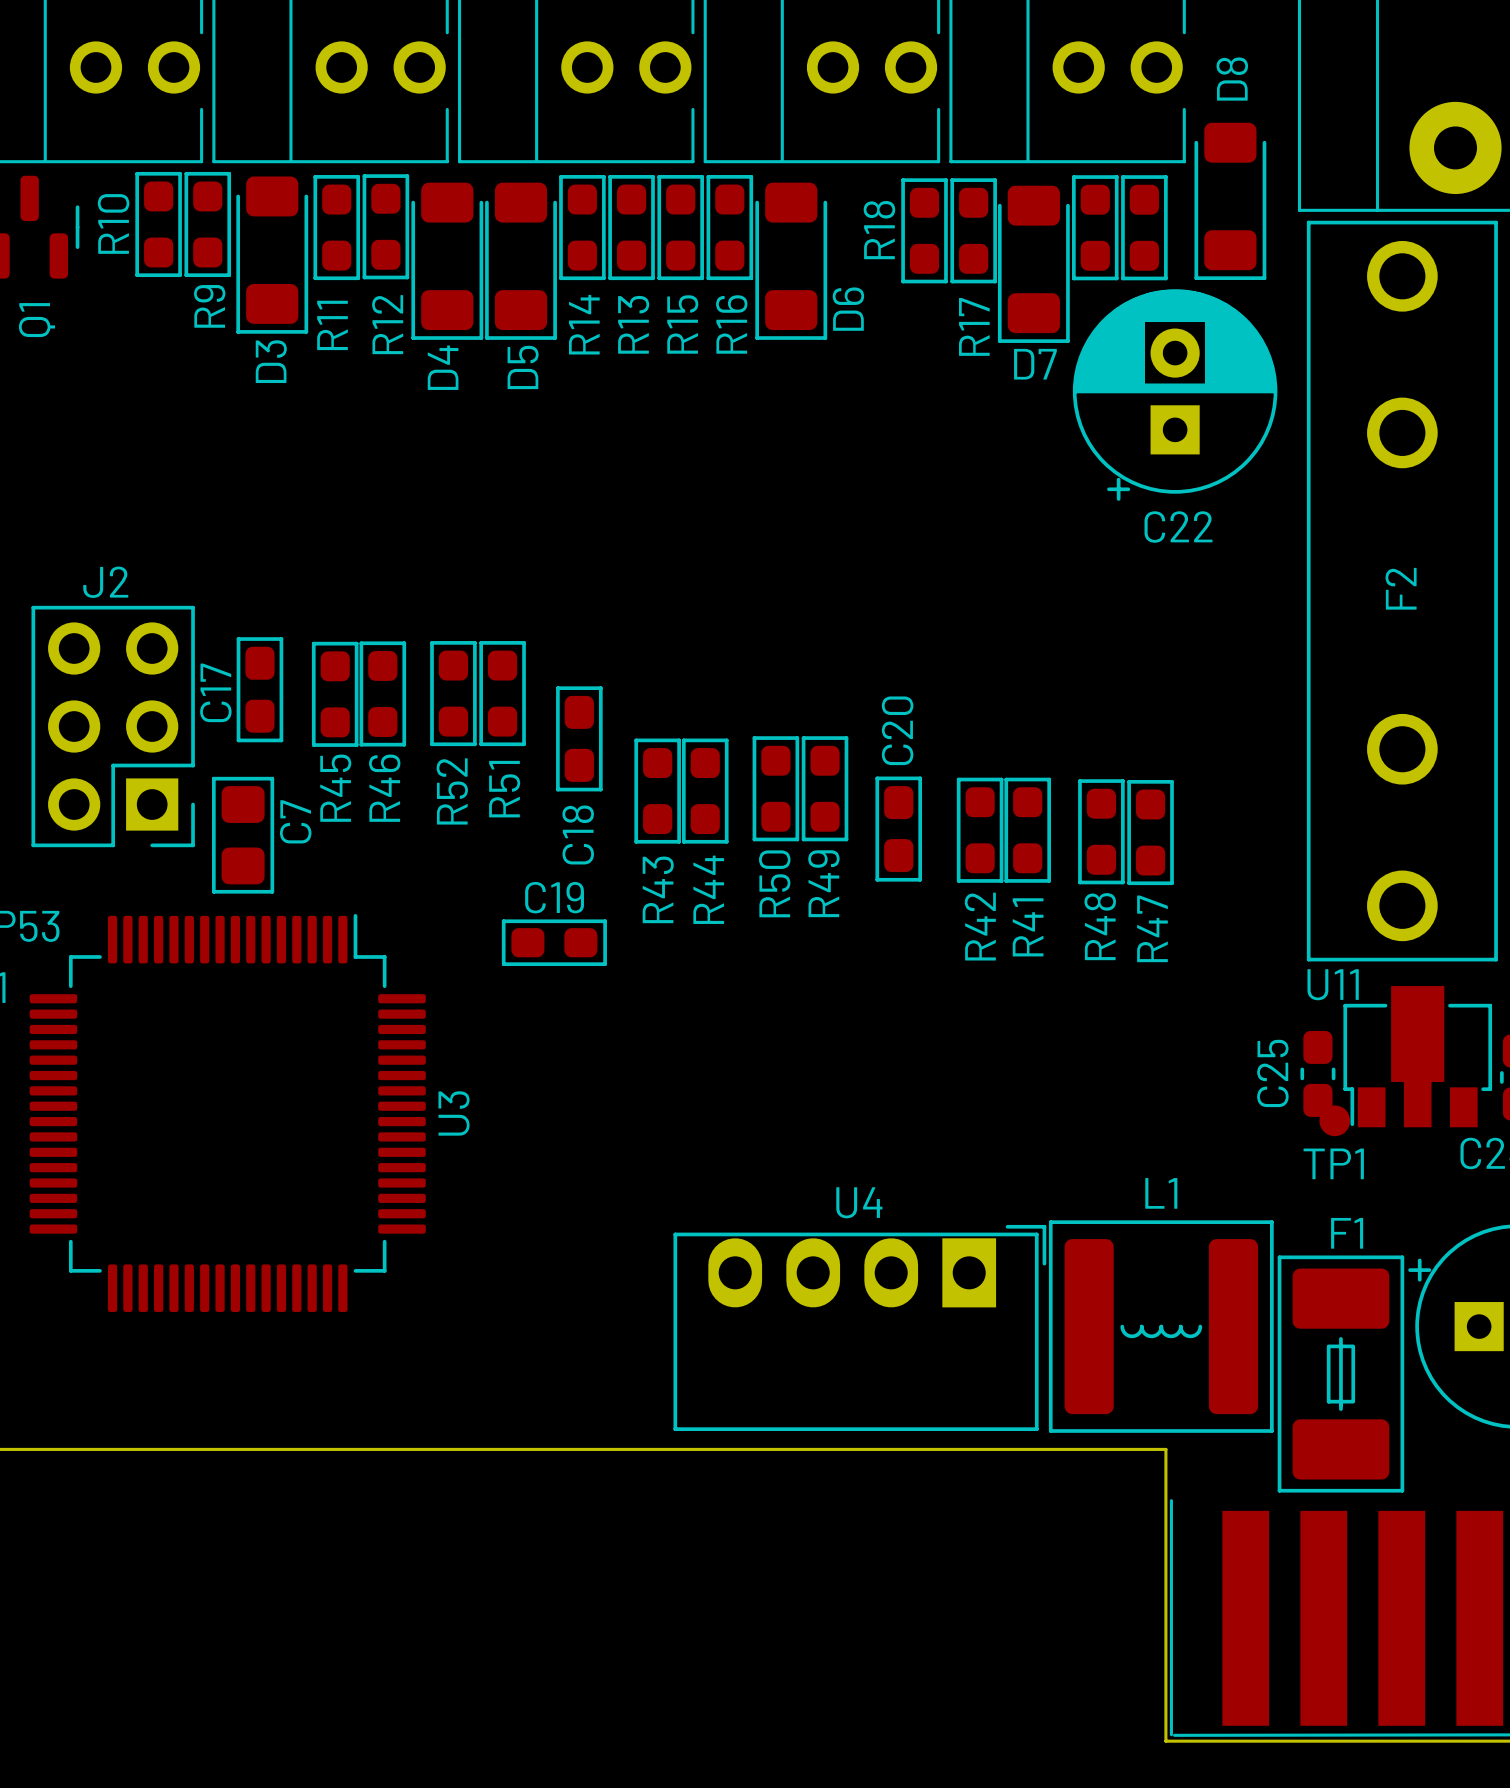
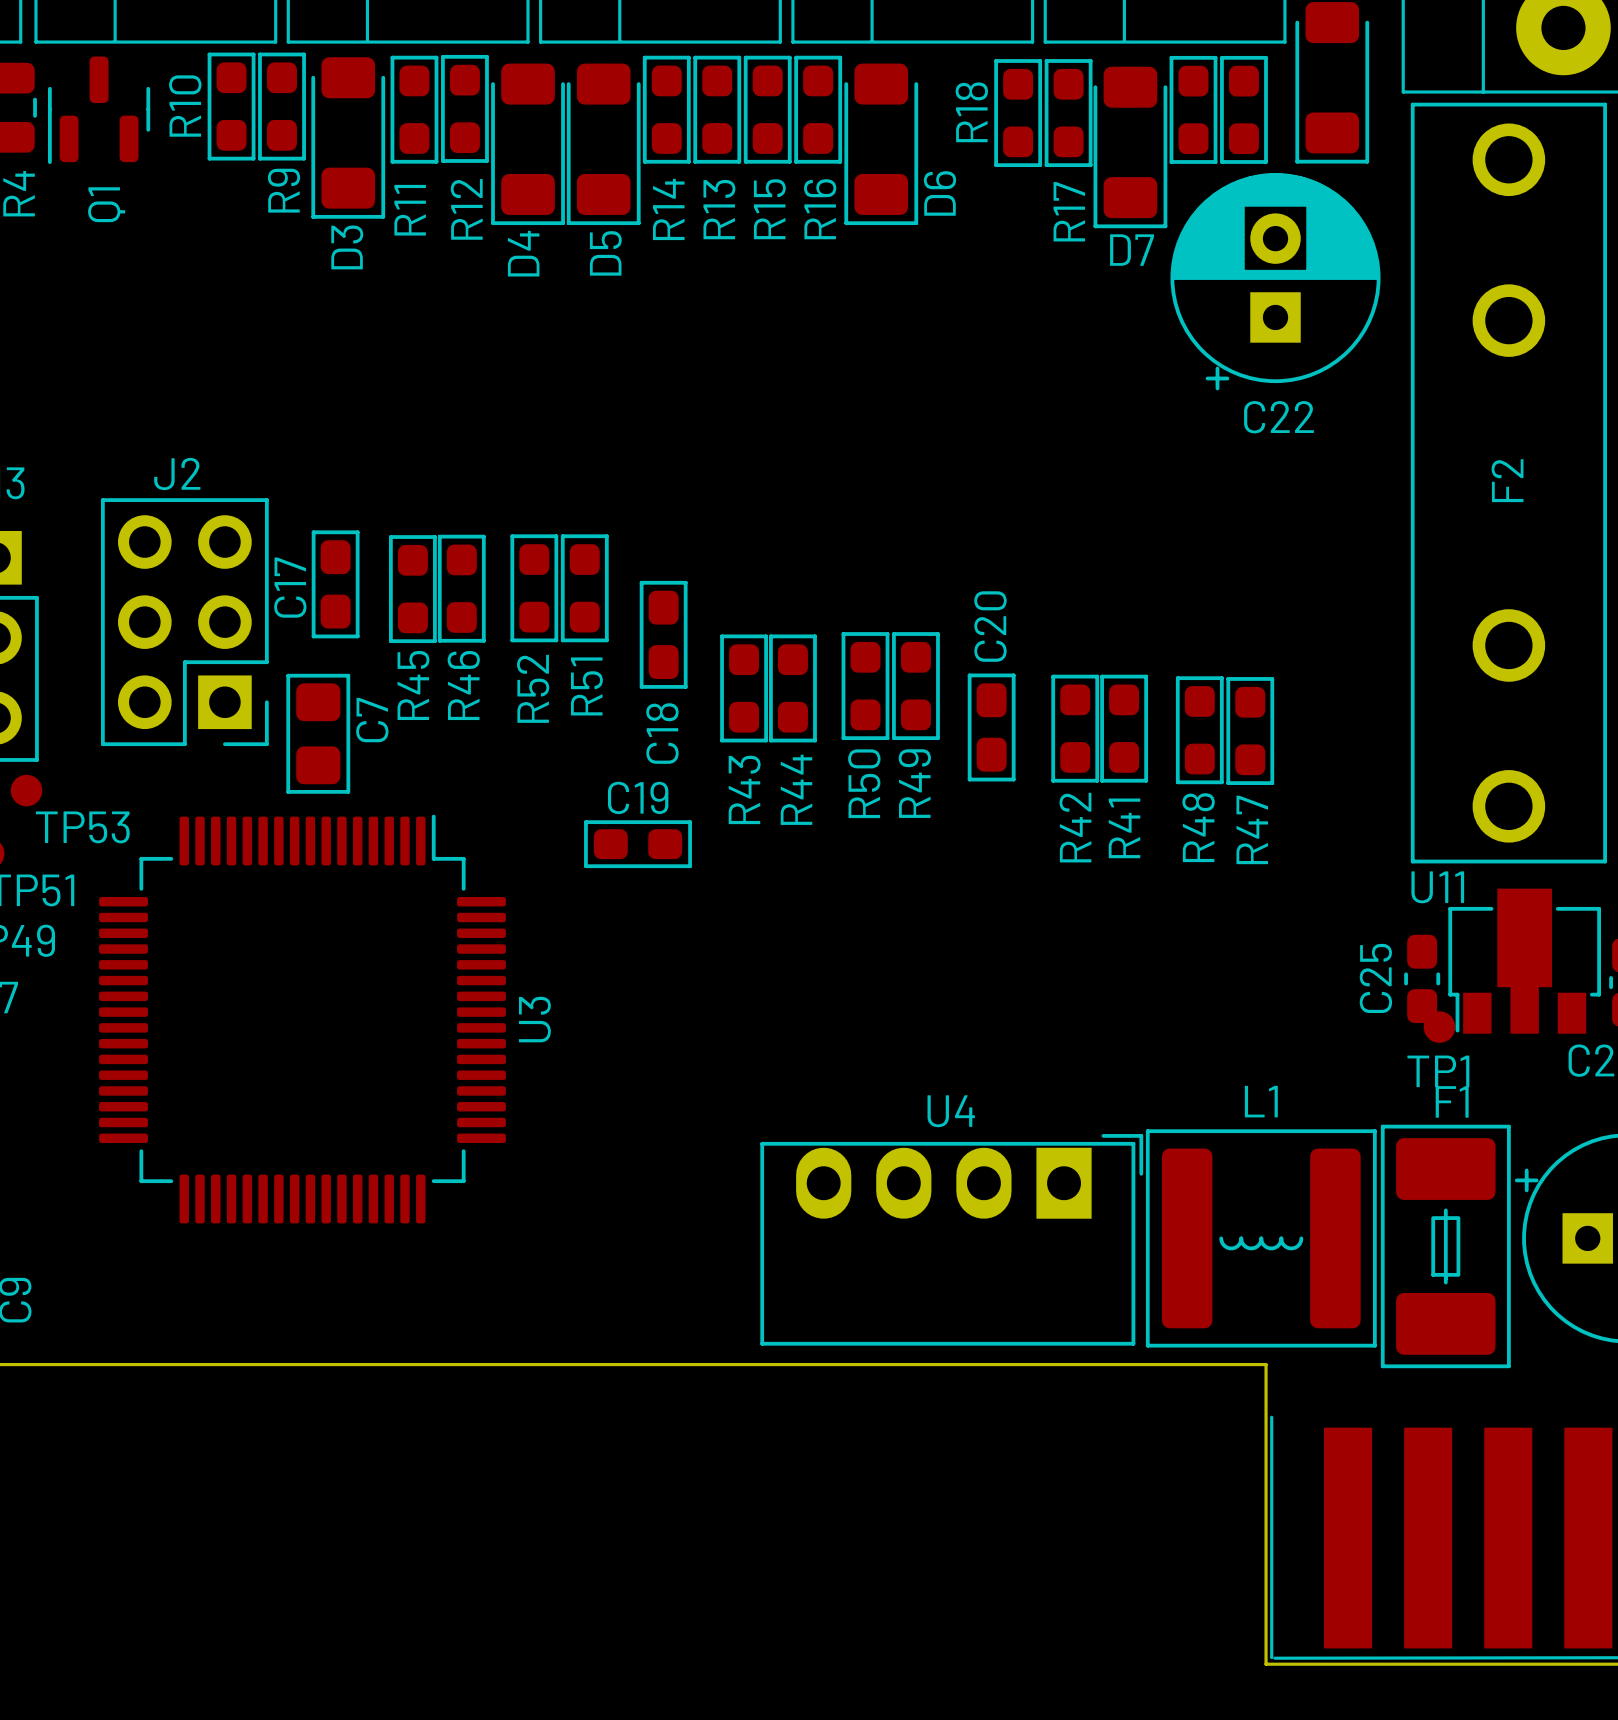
F1 position: (1340, 1374) -> (1445, 1246)

